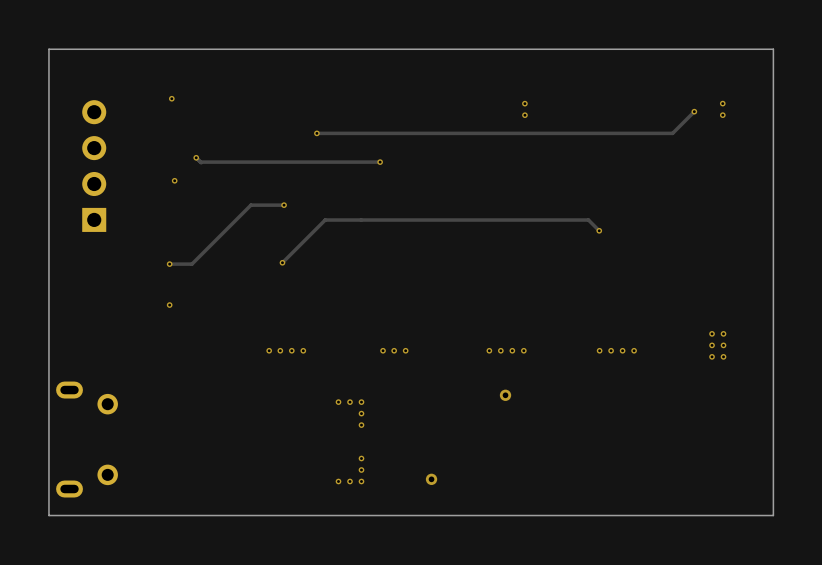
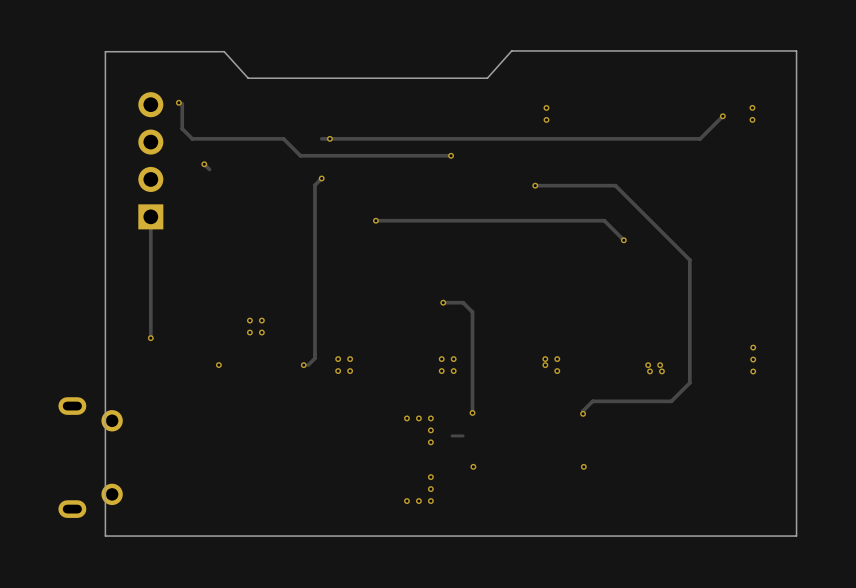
board edge: (773, 49) (773, 515) (48, 515) (48, 49) (773, 49) -> (796, 50) (796, 536) (105, 536) (105, 51) (224, 51) (248, 78) (487, 78) (511, 50) (796, 50)
track: none -> (182, 103) (182, 128) (192, 138) (283, 138) (300, 155) (451, 155)
track: none -> (329, 138) (321, 138)
via: none -> (451, 155)
track: (380, 162) (200, 162) -> none
via: (380, 162) -> none
part position: (94, 166) -> (150, 160)
track: none -> (321, 178) (314, 185) (314, 358) (308, 365)
via: none -> (321, 178)
track: none -> (535, 185) (615, 185) (689, 260) (689, 382) (671, 401) (592, 401) (583, 410) (583, 413)
via: none -> (535, 185)
via: (174, 180) -> none
track: (284, 205) (250, 205) (191, 264) (169, 264) -> none
via: (284, 205) -> none
track: none -> (150, 216) (150, 338)
via: none -> (375, 220)
track: (588, 220) (325, 220) (282, 262) -> (612, 229) (604, 220) (375, 220)
via: (282, 262) -> none
via: (169, 264) -> none
track: none -> (443, 302) (463, 302) (472, 312) (472, 412)
via: none -> (443, 302)
via: (169, 305) -> none
via: none -> (249, 320)
via: none -> (261, 320)
via: none -> (249, 332)
via: none -> (261, 332)
via: none -> (150, 338)
via: (712, 333) -> none
via: none -> (338, 359)
via: none -> (350, 359)
via: none -> (441, 359)
via: none -> (453, 359)
via: none -> (545, 359)
via: none -> (557, 359)
via: (712, 345) -> none
via: none -> (218, 365)
via: (269, 350) -> none
via: (280, 350) -> none
via: (303, 350) -> none
via: (383, 350) -> none
via: (394, 350) -> none
via: (405, 350) -> none
via: (489, 350) -> none
via: (500, 350) -> none
via: (512, 350) -> none
via: (599, 350) -> none
via: (611, 350) -> none
via: none -> (338, 371)
via: none -> (350, 371)
via: none -> (441, 371)
via: none -> (453, 371)
via: none -> (557, 371)
via: none -> (649, 371)
via: none -> (661, 371)
via: (712, 356) -> none
via: (505, 395) -> none
via: none -> (472, 412)
via: none -> (583, 413)
via: none -> (406, 418)
via: none -> (418, 418)
via: none -> (430, 418)
via: (338, 402) -> none
via: (349, 402) -> none
via: (361, 402) -> none
via: (361, 413) -> none
via: none -> (430, 430)
track: none -> (463, 435) (452, 435)
via: none -> (430, 442)
via: (361, 425) -> none
via: none -> (473, 466)
via: none -> (583, 466)
via: (361, 458) -> none
via: none -> (430, 477)
via: none -> (430, 489)
via: (361, 470) -> none
via: (431, 479) -> none
via: (338, 481) -> none
via: (349, 481) -> none
via: (361, 481) -> none
via: none -> (406, 501)
via: none -> (418, 501)
via: none -> (430, 501)

